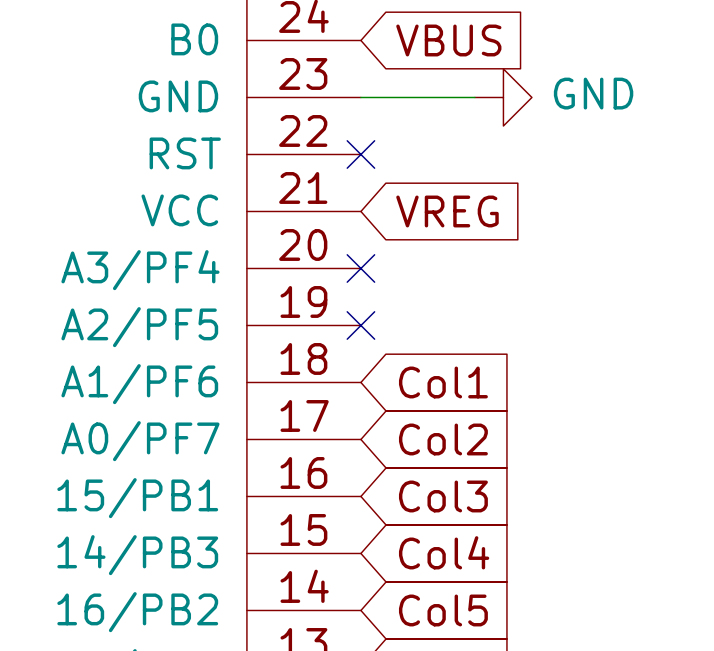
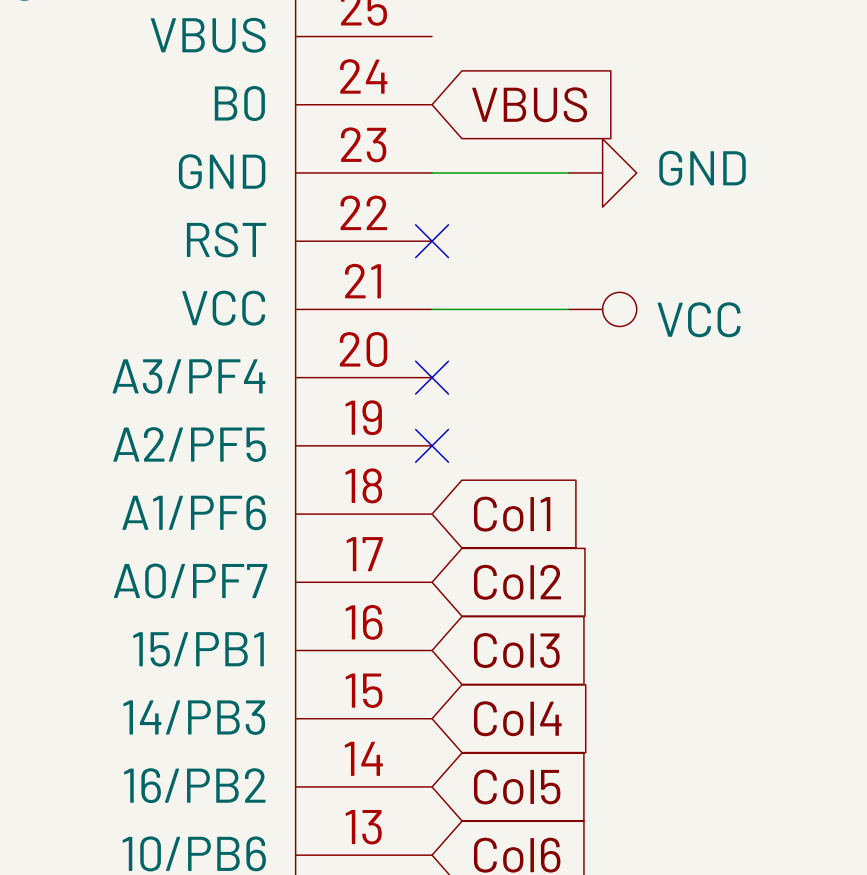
wire: none -> (432, 309) (568, 309)
global label: VREG (447, 211) -> none
power symbol: none -> VCC (602, 309)

